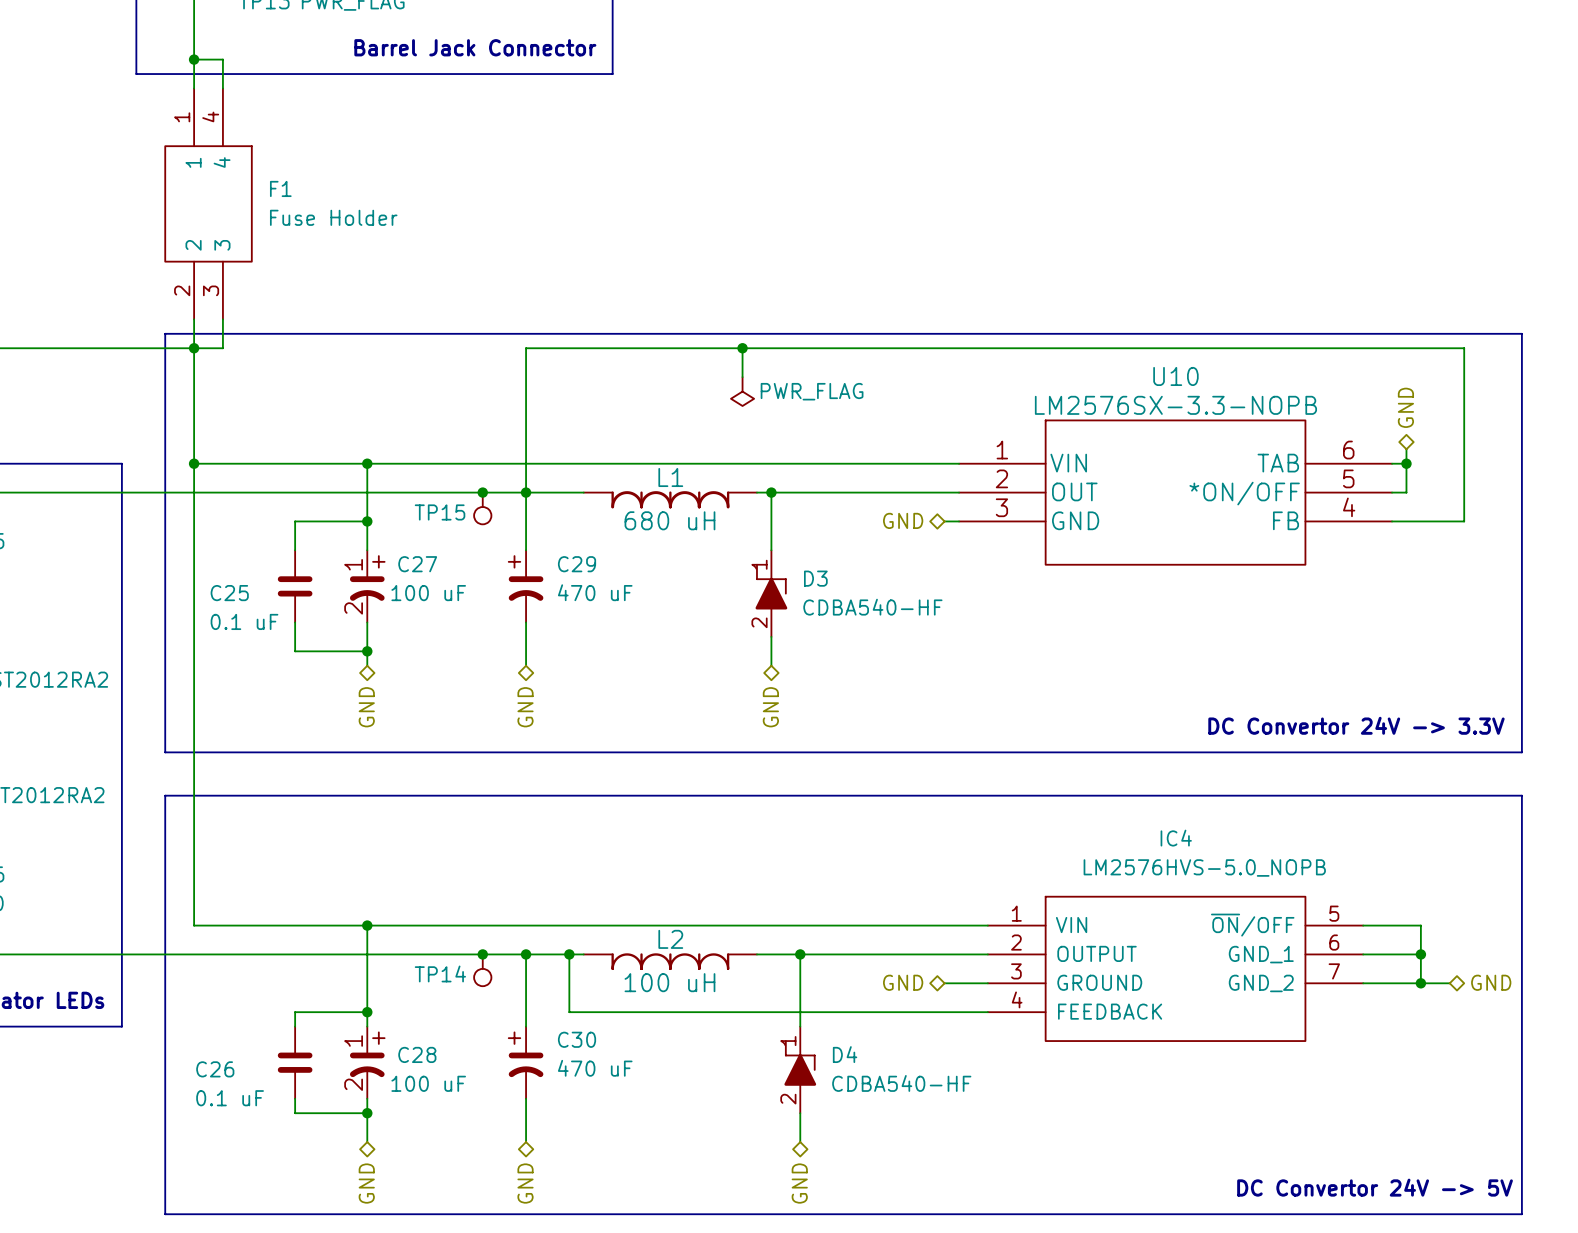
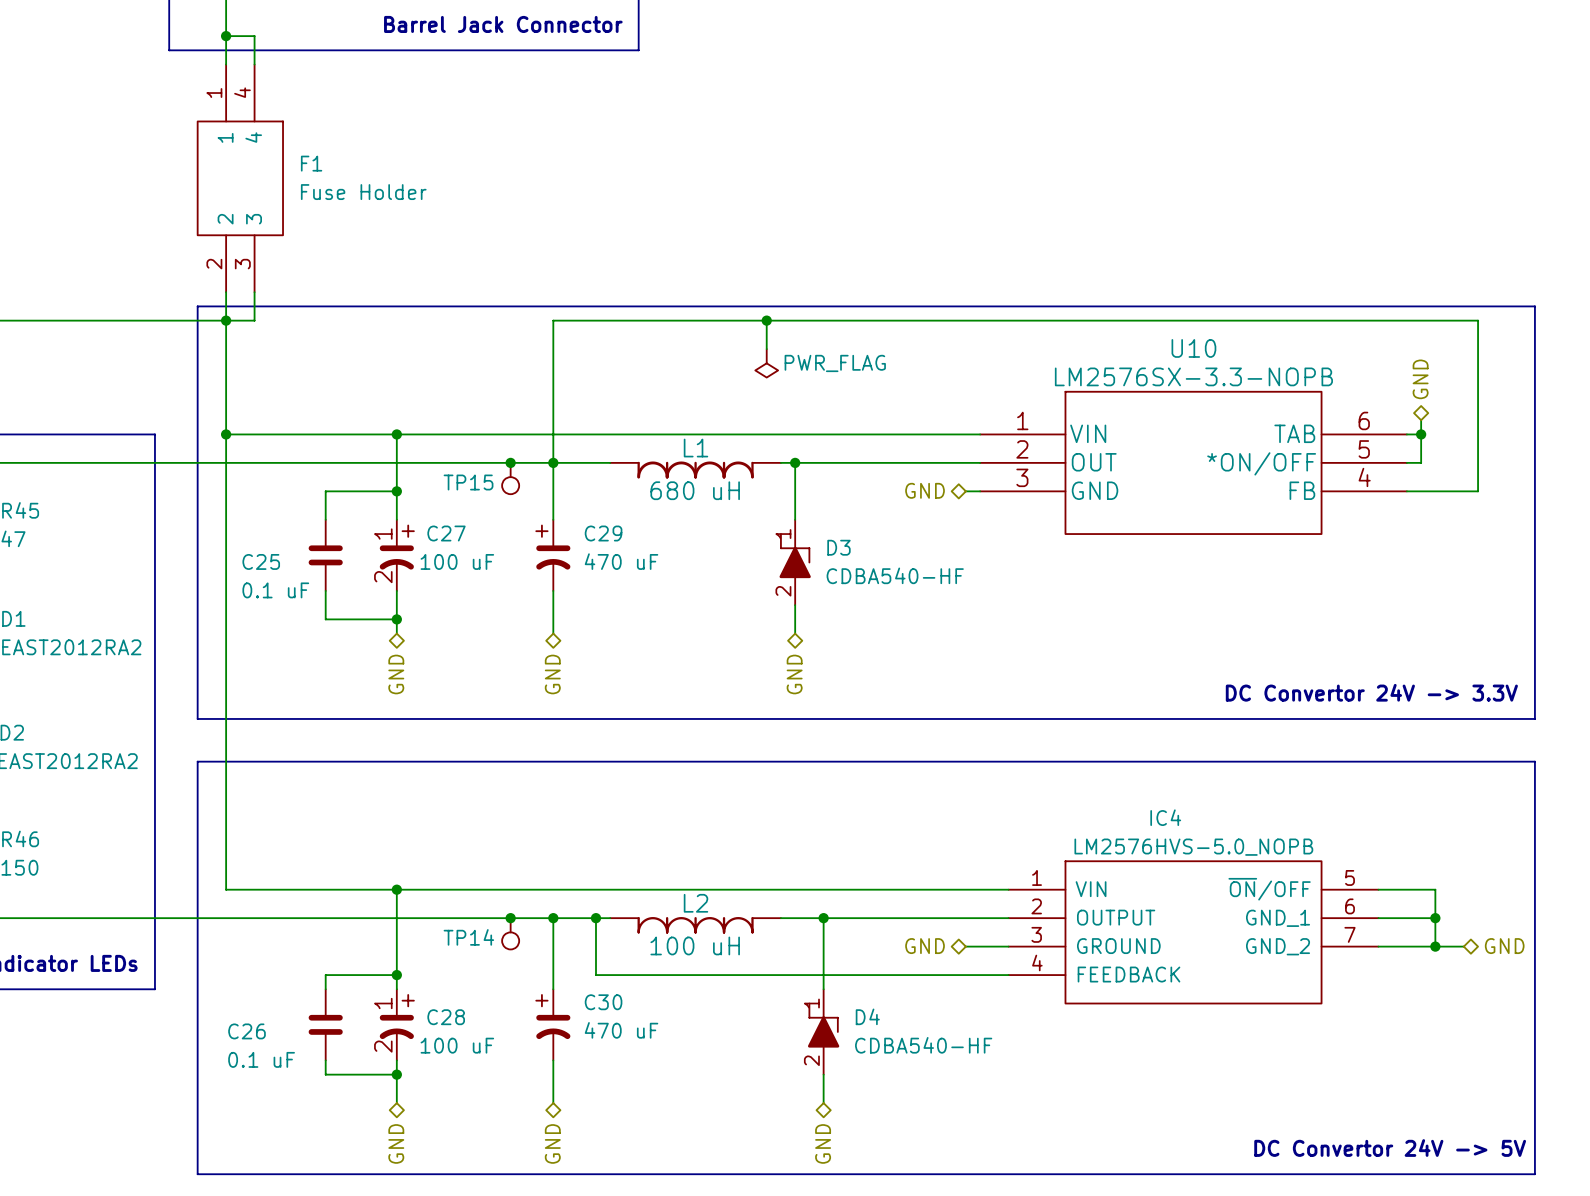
IC4 name position: IC4 (1176, 838) -> IC4 (1165, 817)
IC4 value position: LM2576HVS-5.0_NOPB (1204, 867) -> LM2576HVS-5.0_NOPB (1193, 847)

